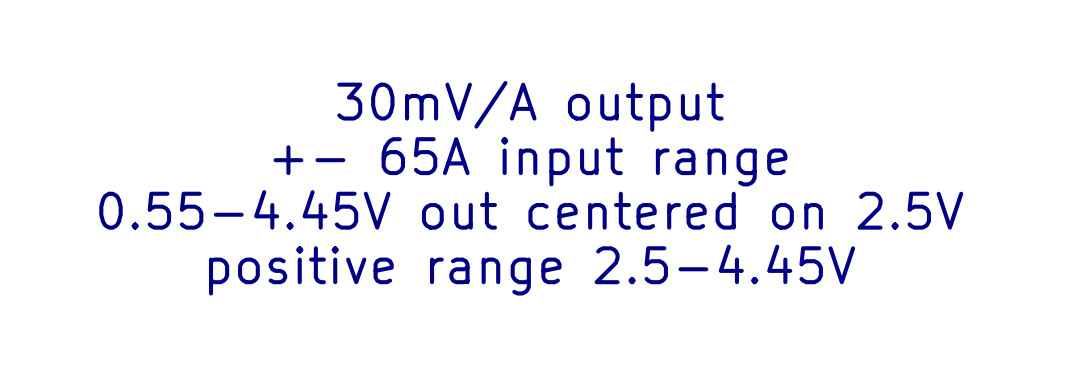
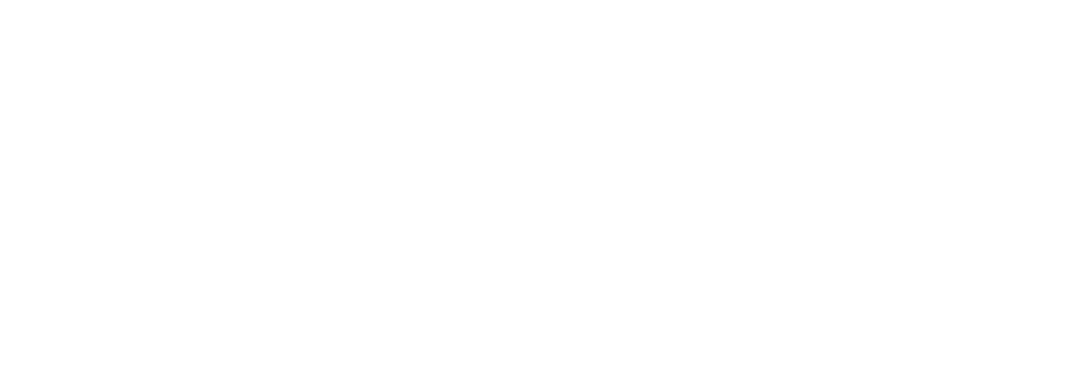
text: 30mV/A output (530, 106) -> none
text: +- 65A input range (530, 161) -> none
text: 0.55-4.45V out centered on 2.5V (531, 209) -> none
text: positive range 2.5-4.45V (532, 270) -> none

